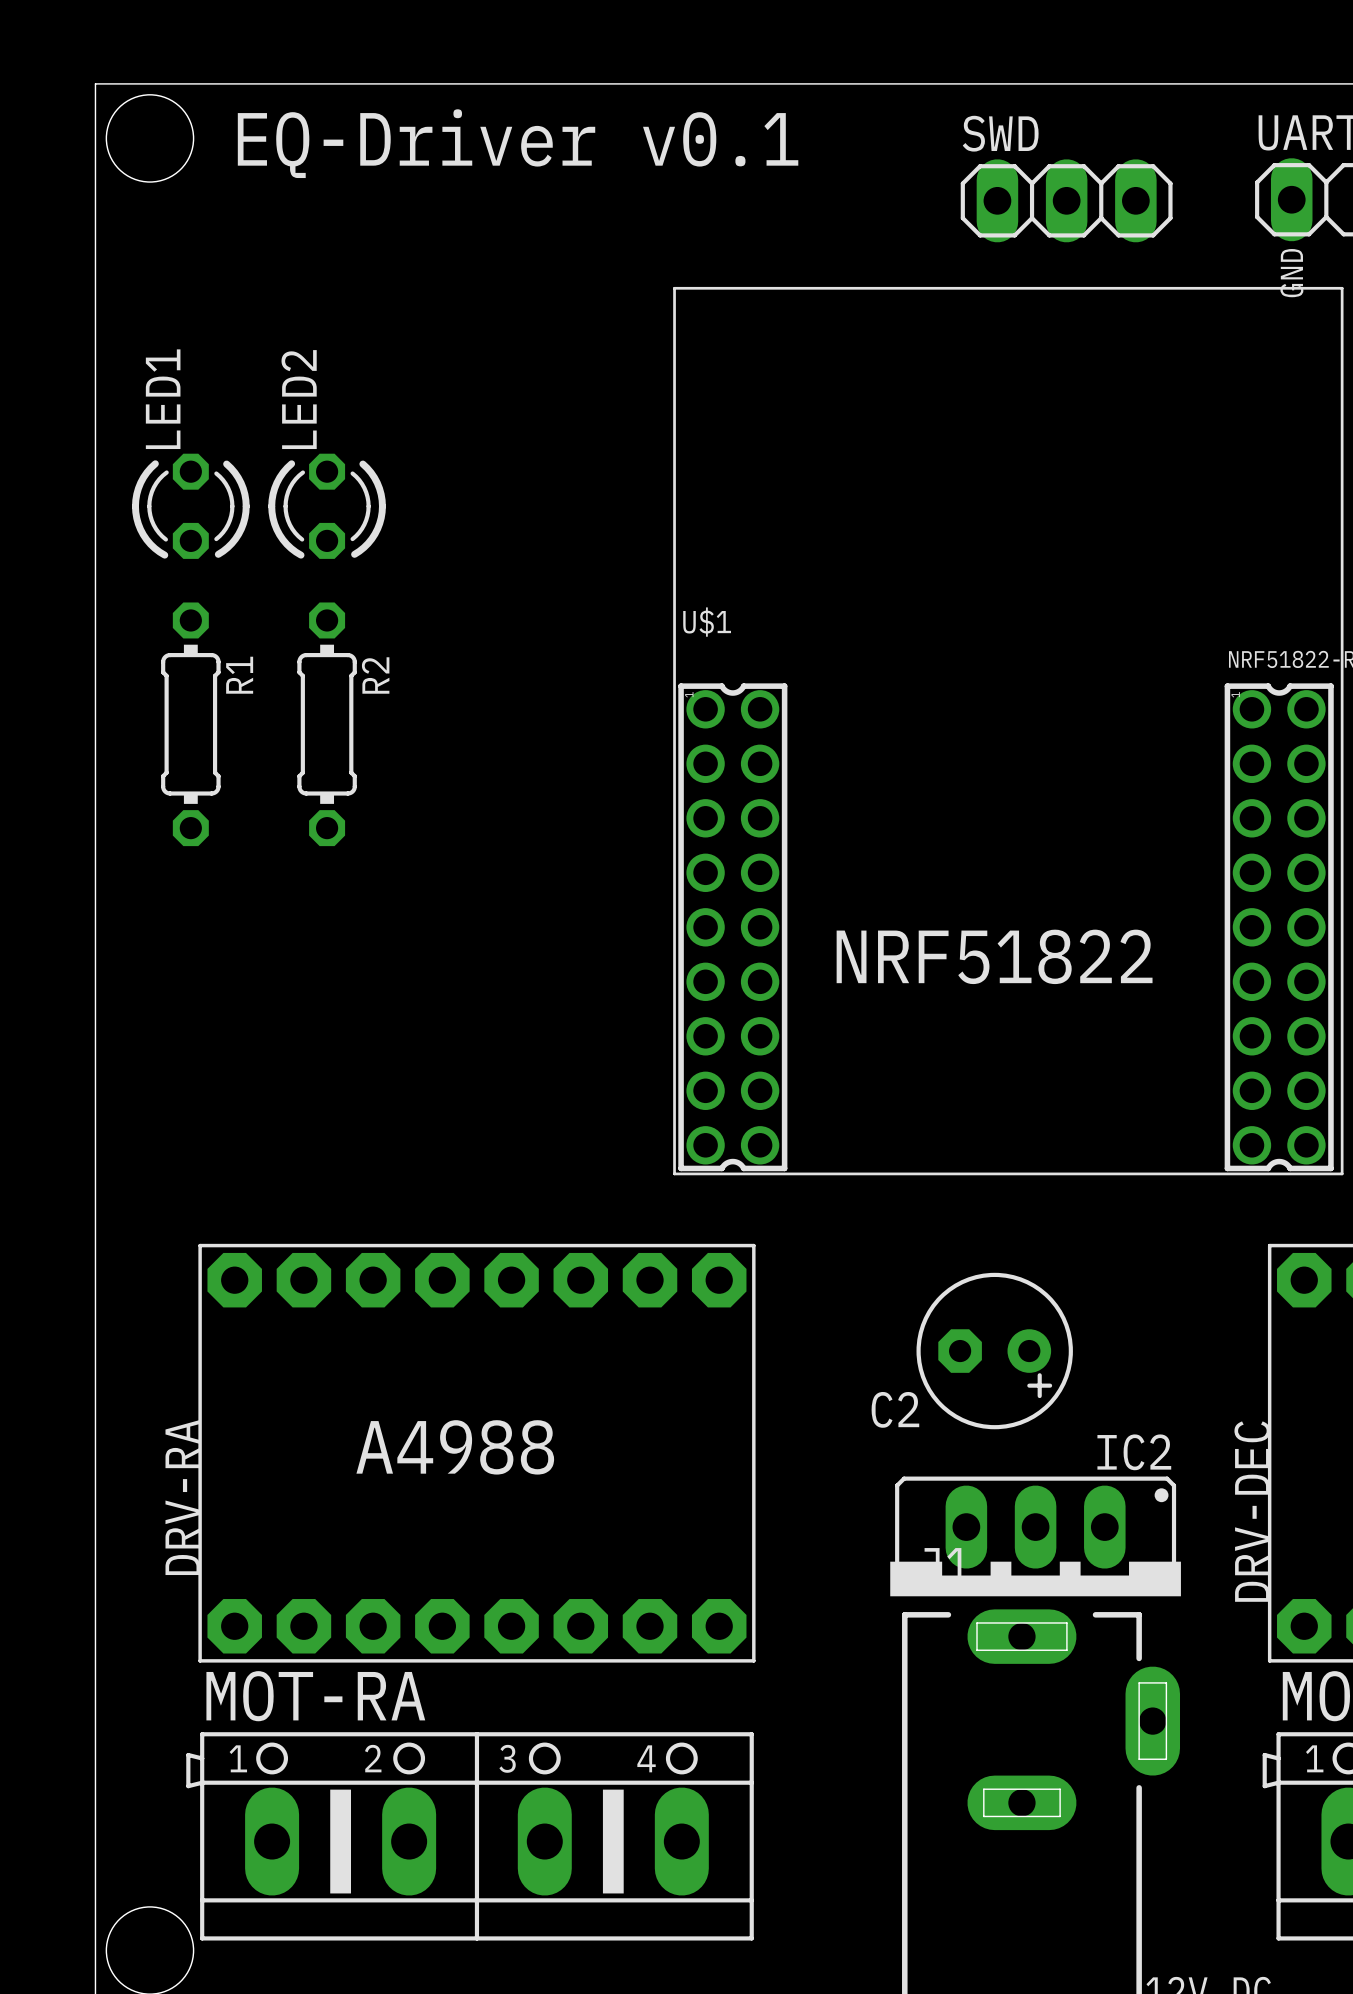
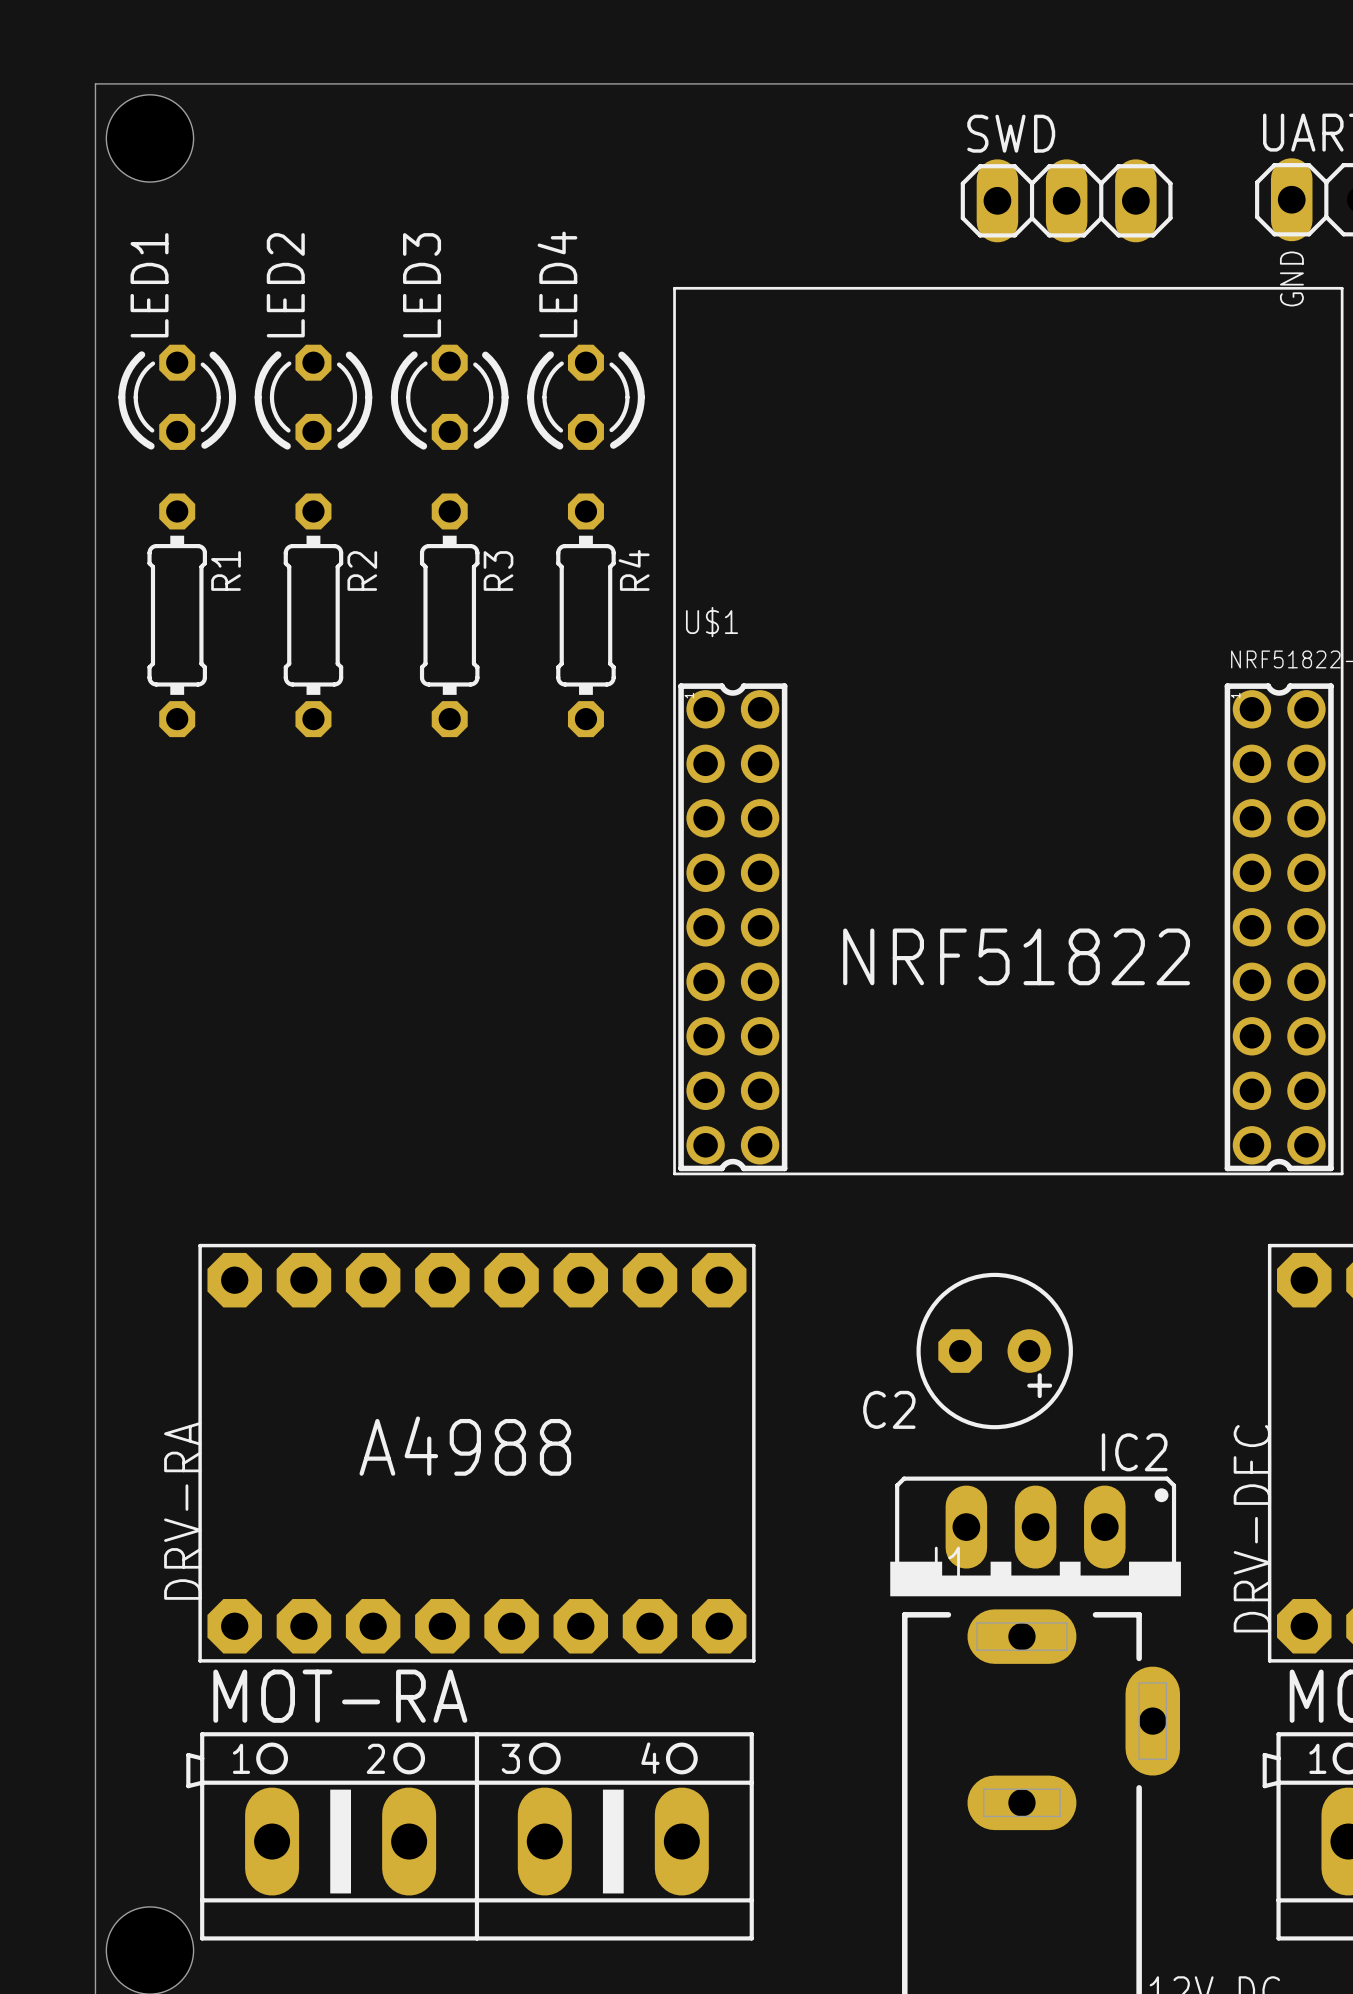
text: EQ-Driver v0.1 (518, 143) -> none
LED3: none -> (449, 397)
LED4: none -> (585, 397)
LED1 position: (190, 506) -> (177, 397)
LED2 position: (327, 506) -> (313, 397)
R3: none -> (449, 615)
R4: none -> (585, 615)
R1 position: (190, 724) -> (177, 615)
R2 position: (327, 724) -> (313, 615)

